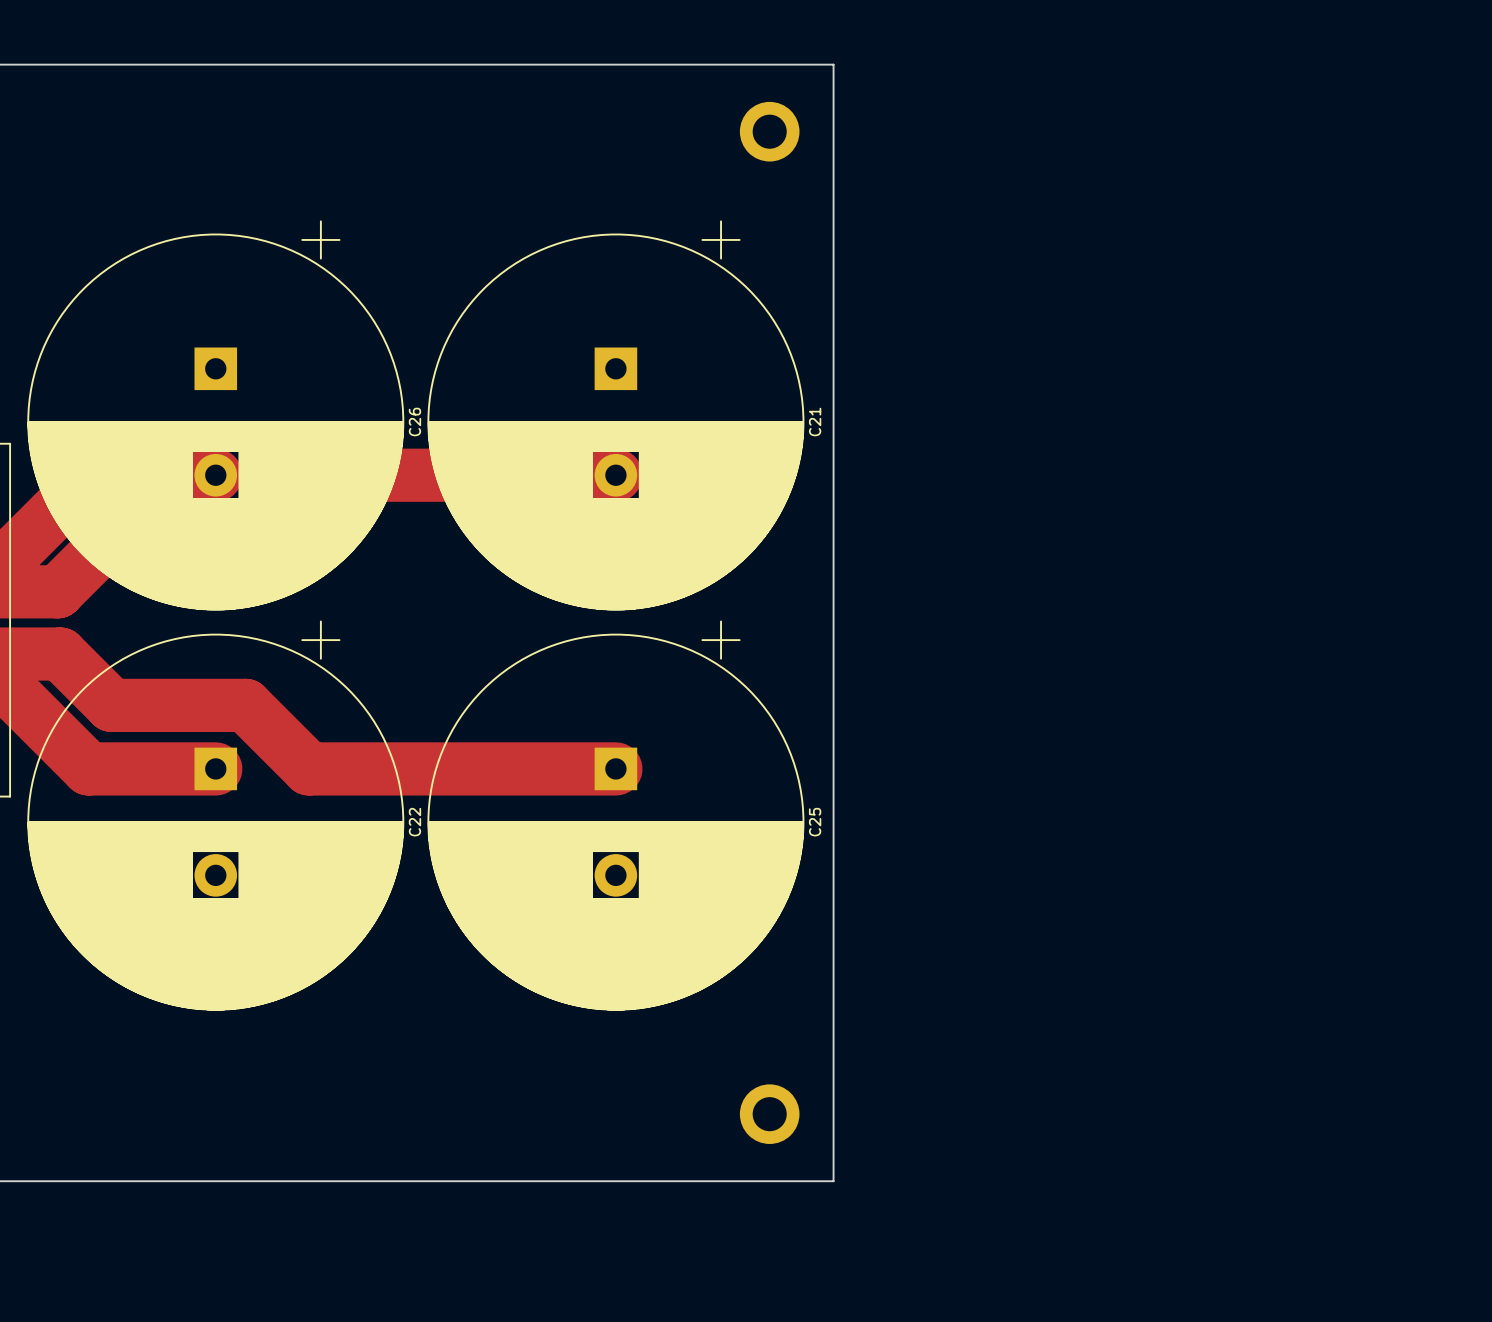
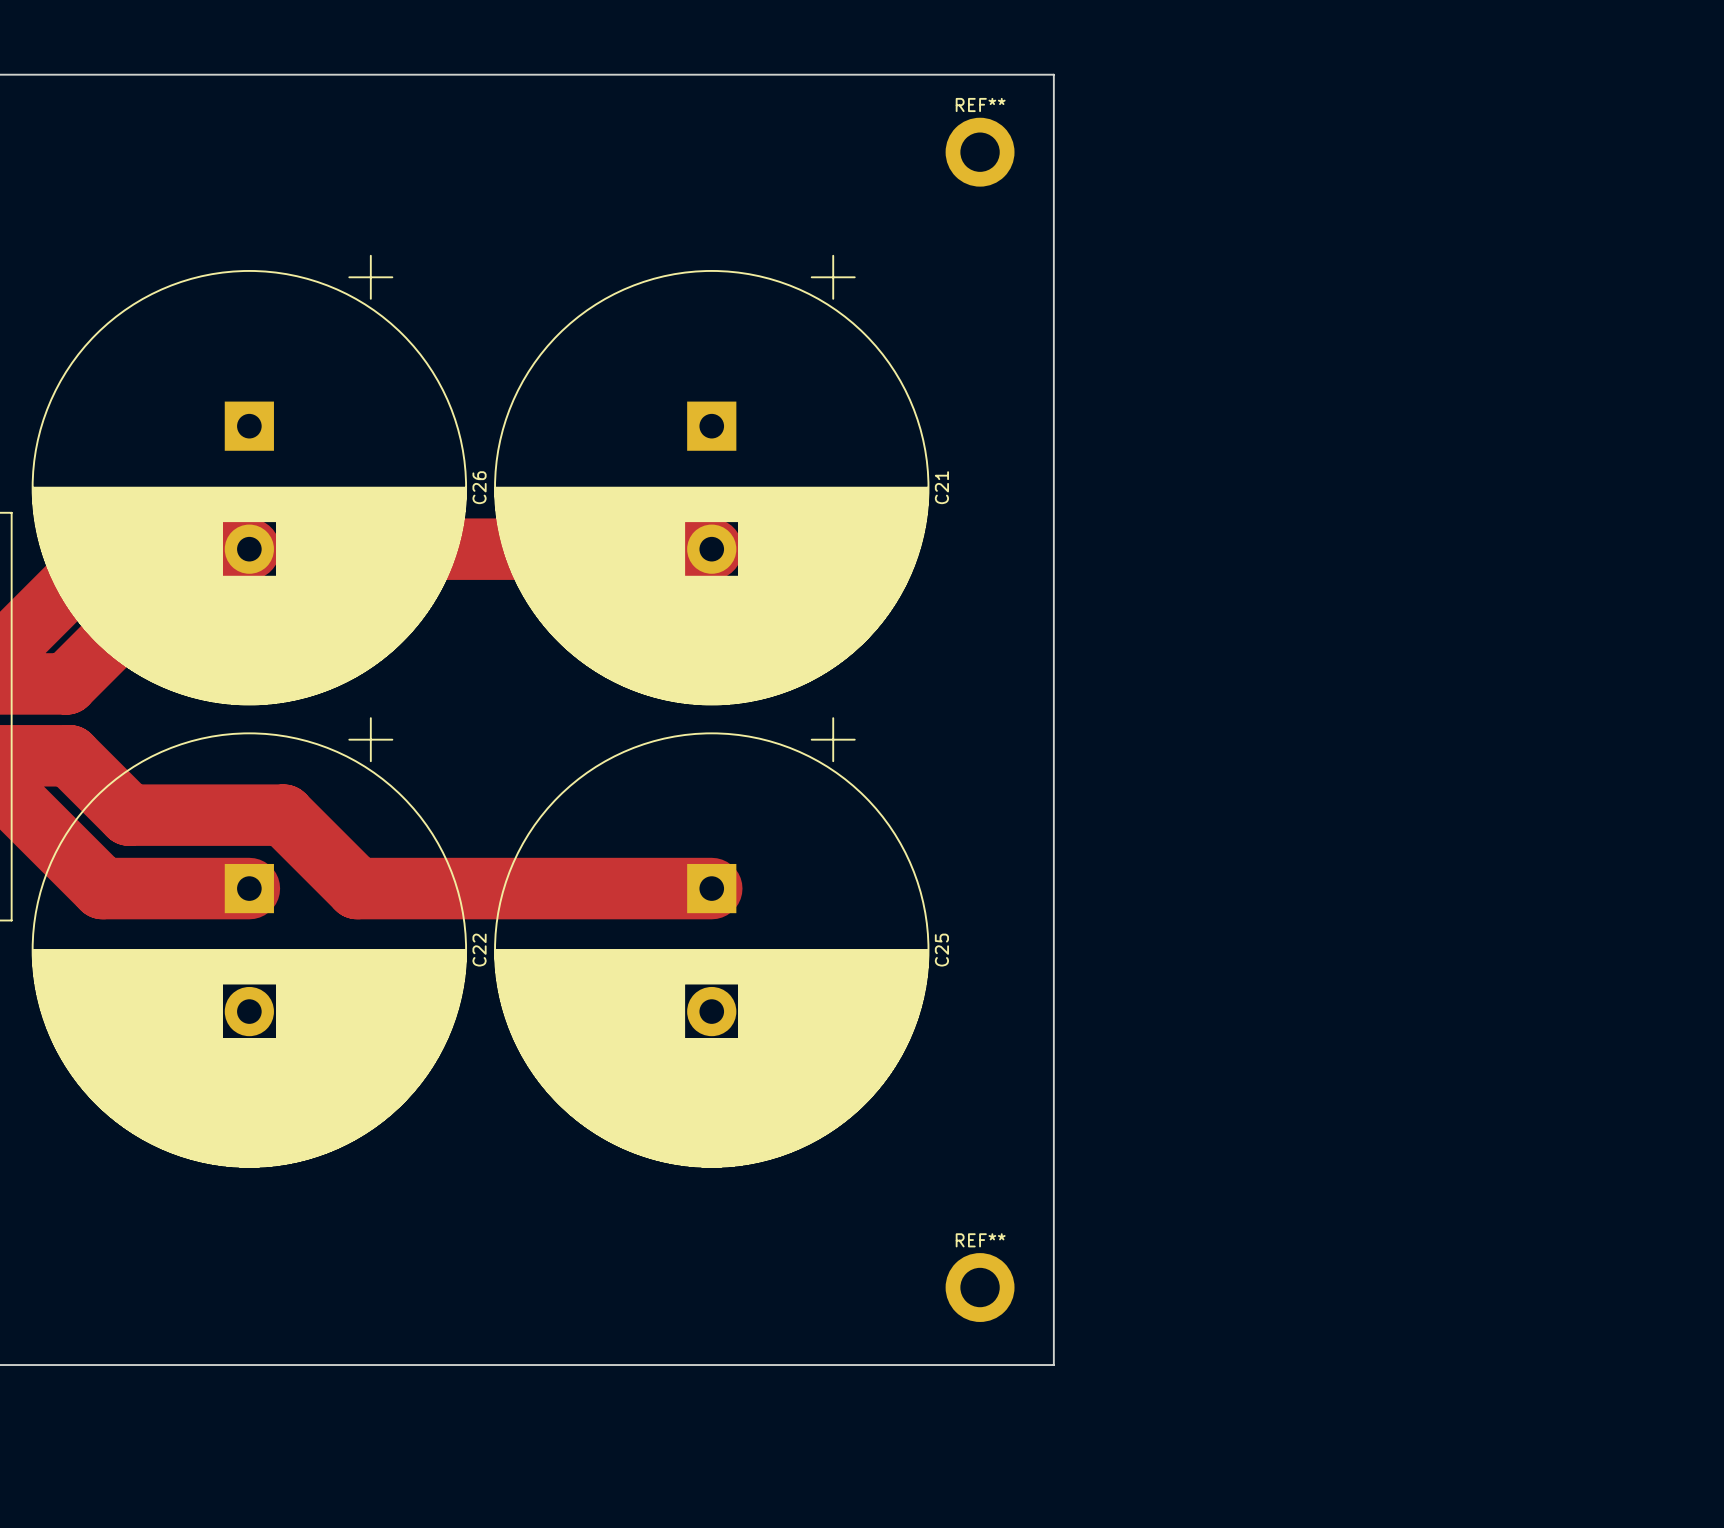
board edge: (833, 64) (833, 1181) -> (963, 74) (1053, 74) (1053, 1365) (963, 1365)
part: (769, 131) -> none
REF**: none -> (980, 152)
part: (769, 1114) -> none
REF**: none -> (980, 1287)

